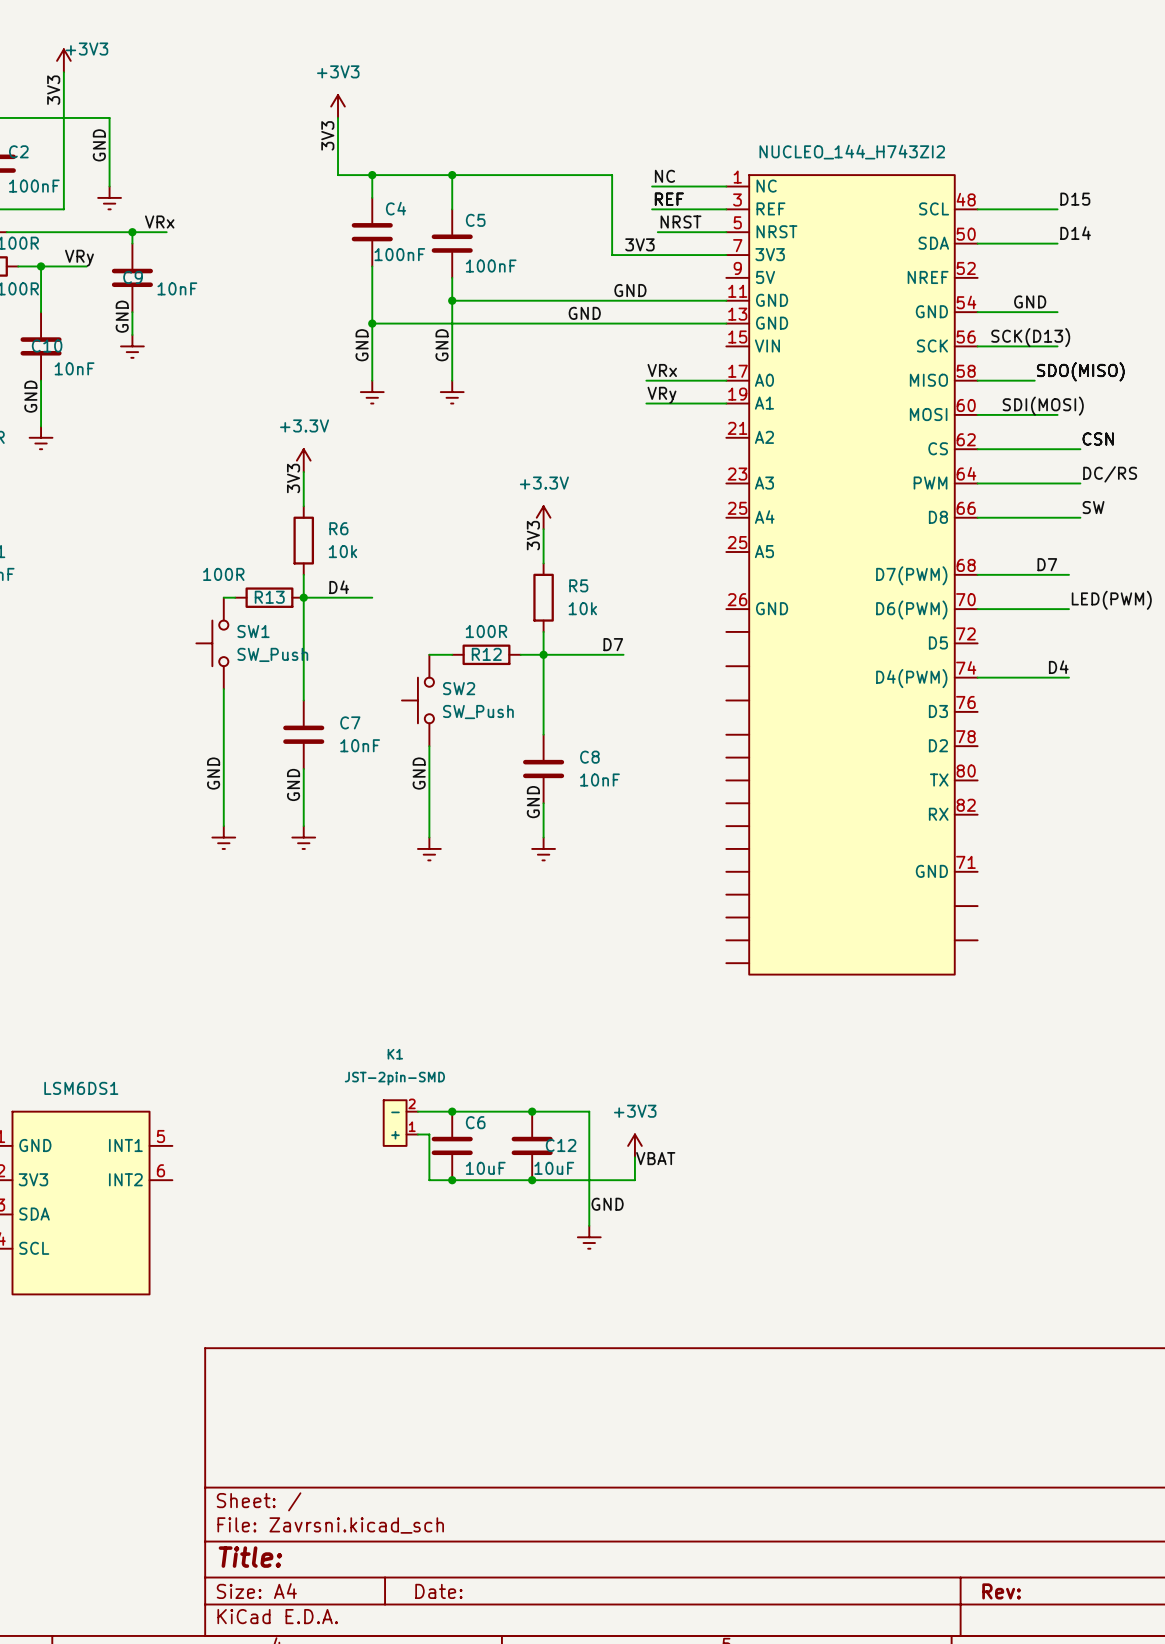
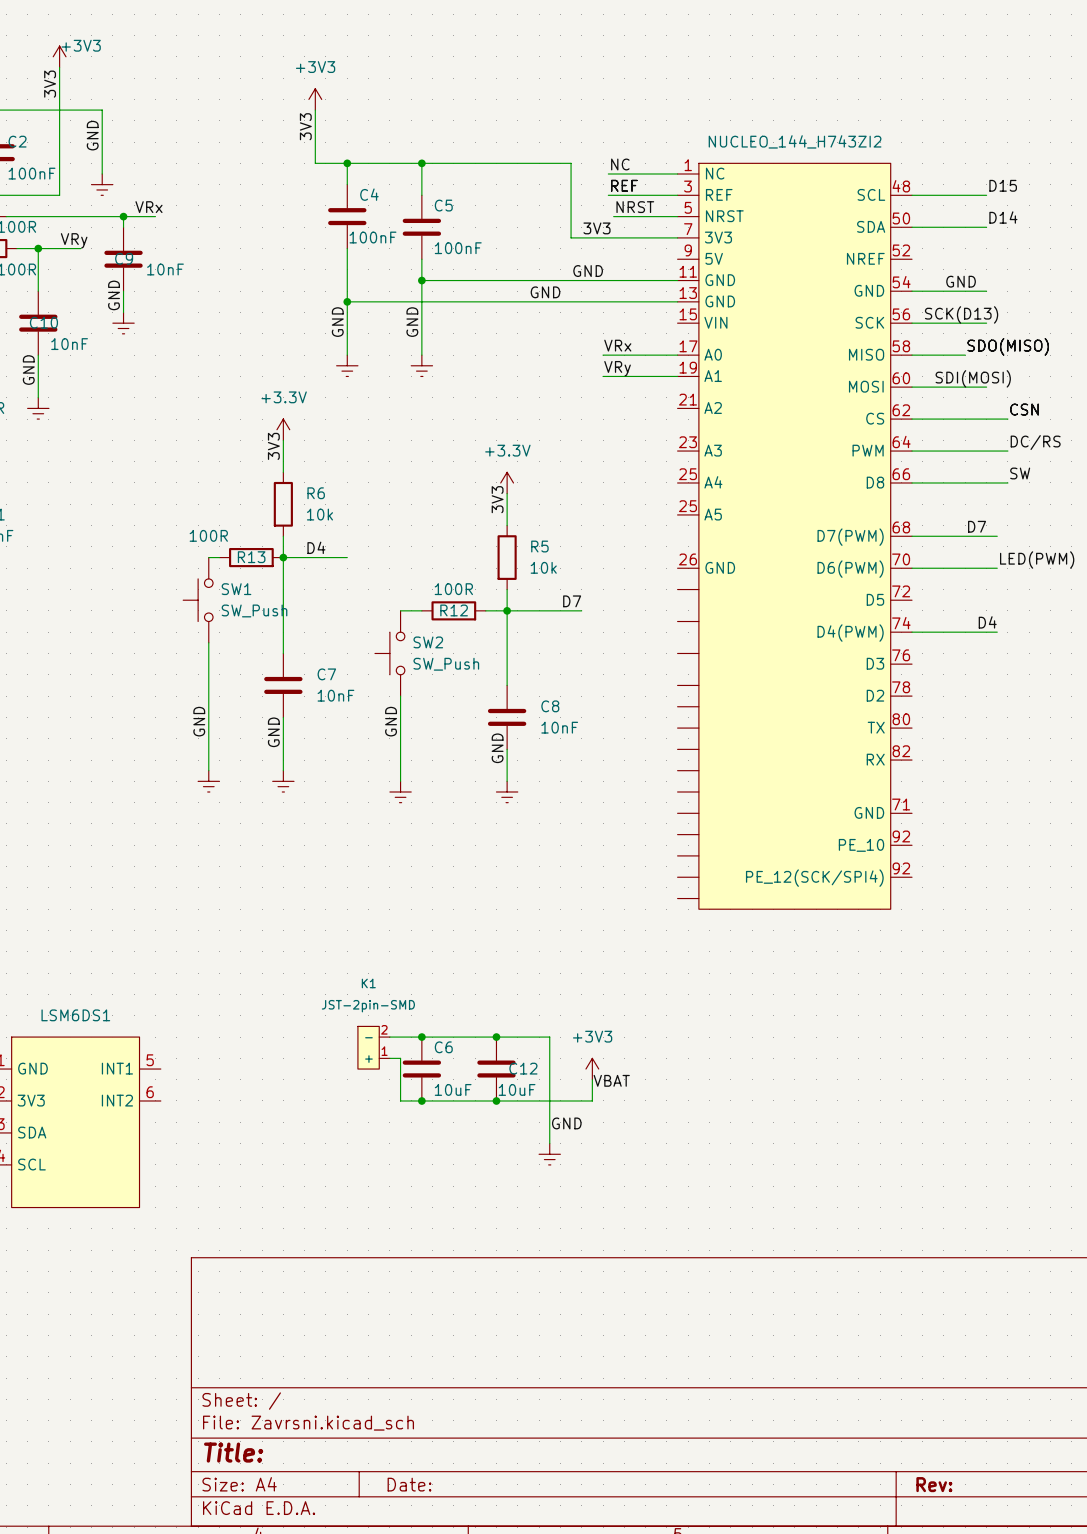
NUCLEO_144_H743ZI2 pin number: none -> 92 (901, 836)
NUCLEO_144_H743ZI2 pin name: none -> PE_10 (861, 845)
NUCLEO_144_H743ZI2 pin number: none -> 92 (901, 868)
NUCLEO_144_H743ZI2 pin name: none -> PE_12(SCK/SPI4) (814, 878)

